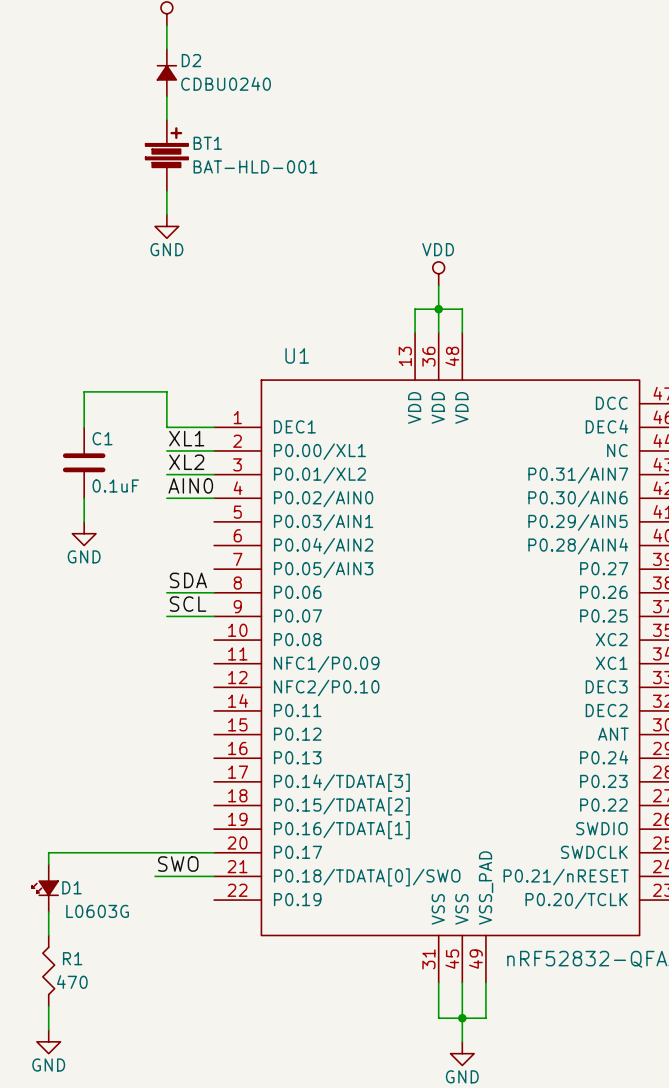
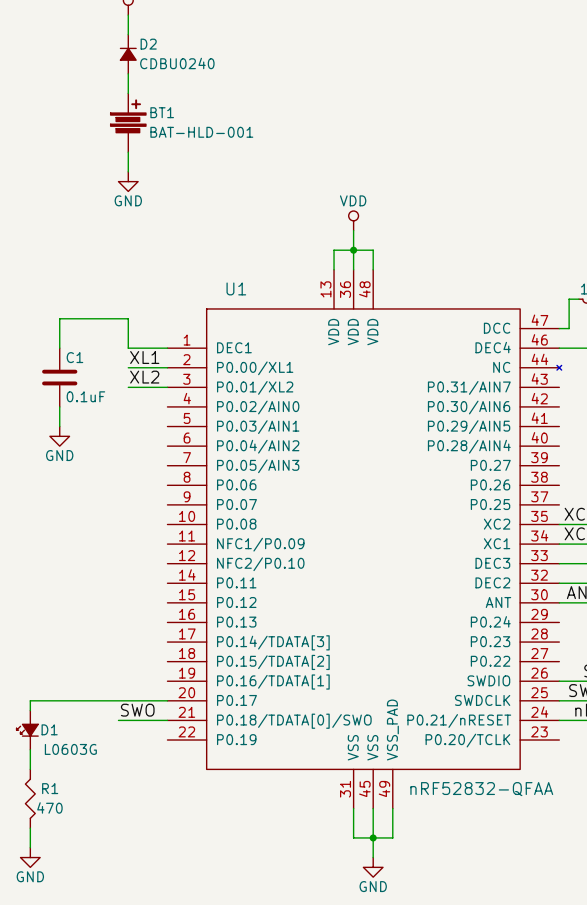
label: AIN0 (190, 485) -> none
wire: (166, 498) (214, 498) -> none
label: SDA (188, 580) -> none
wire: (166, 592) (214, 592) -> none
label: SCL (188, 604) -> none
wire: (166, 616) (214, 616) -> none

